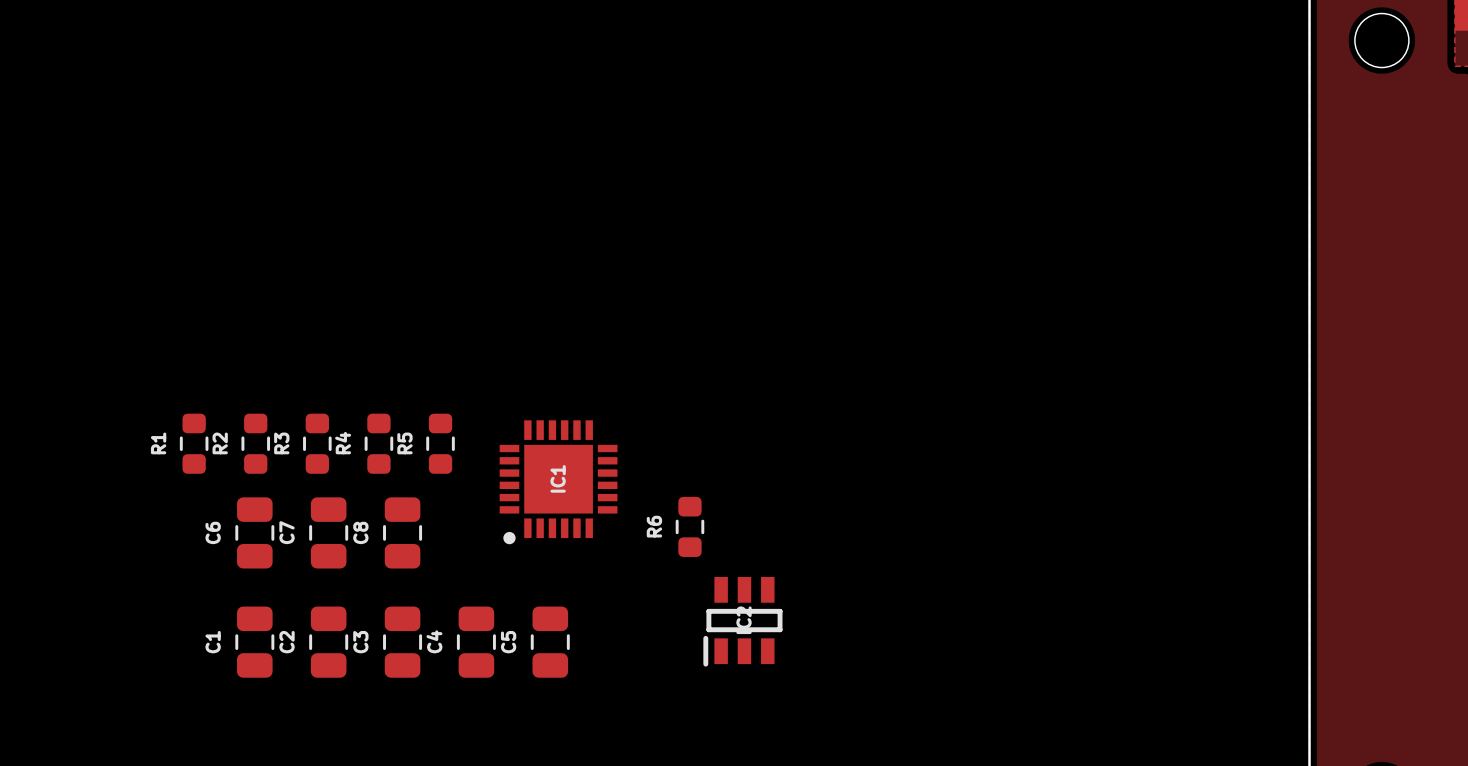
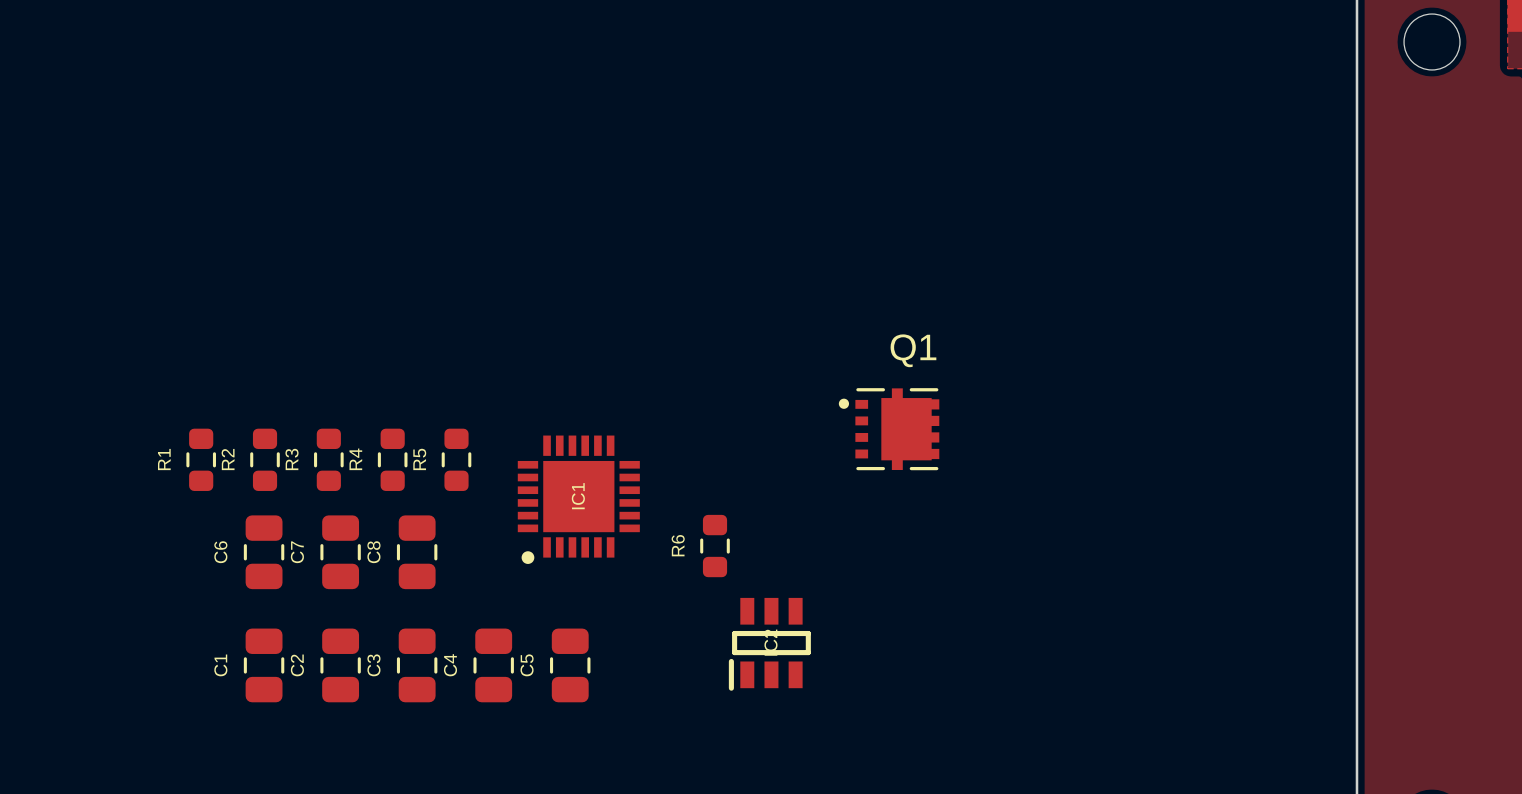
Q1: none -> (889, 429)

